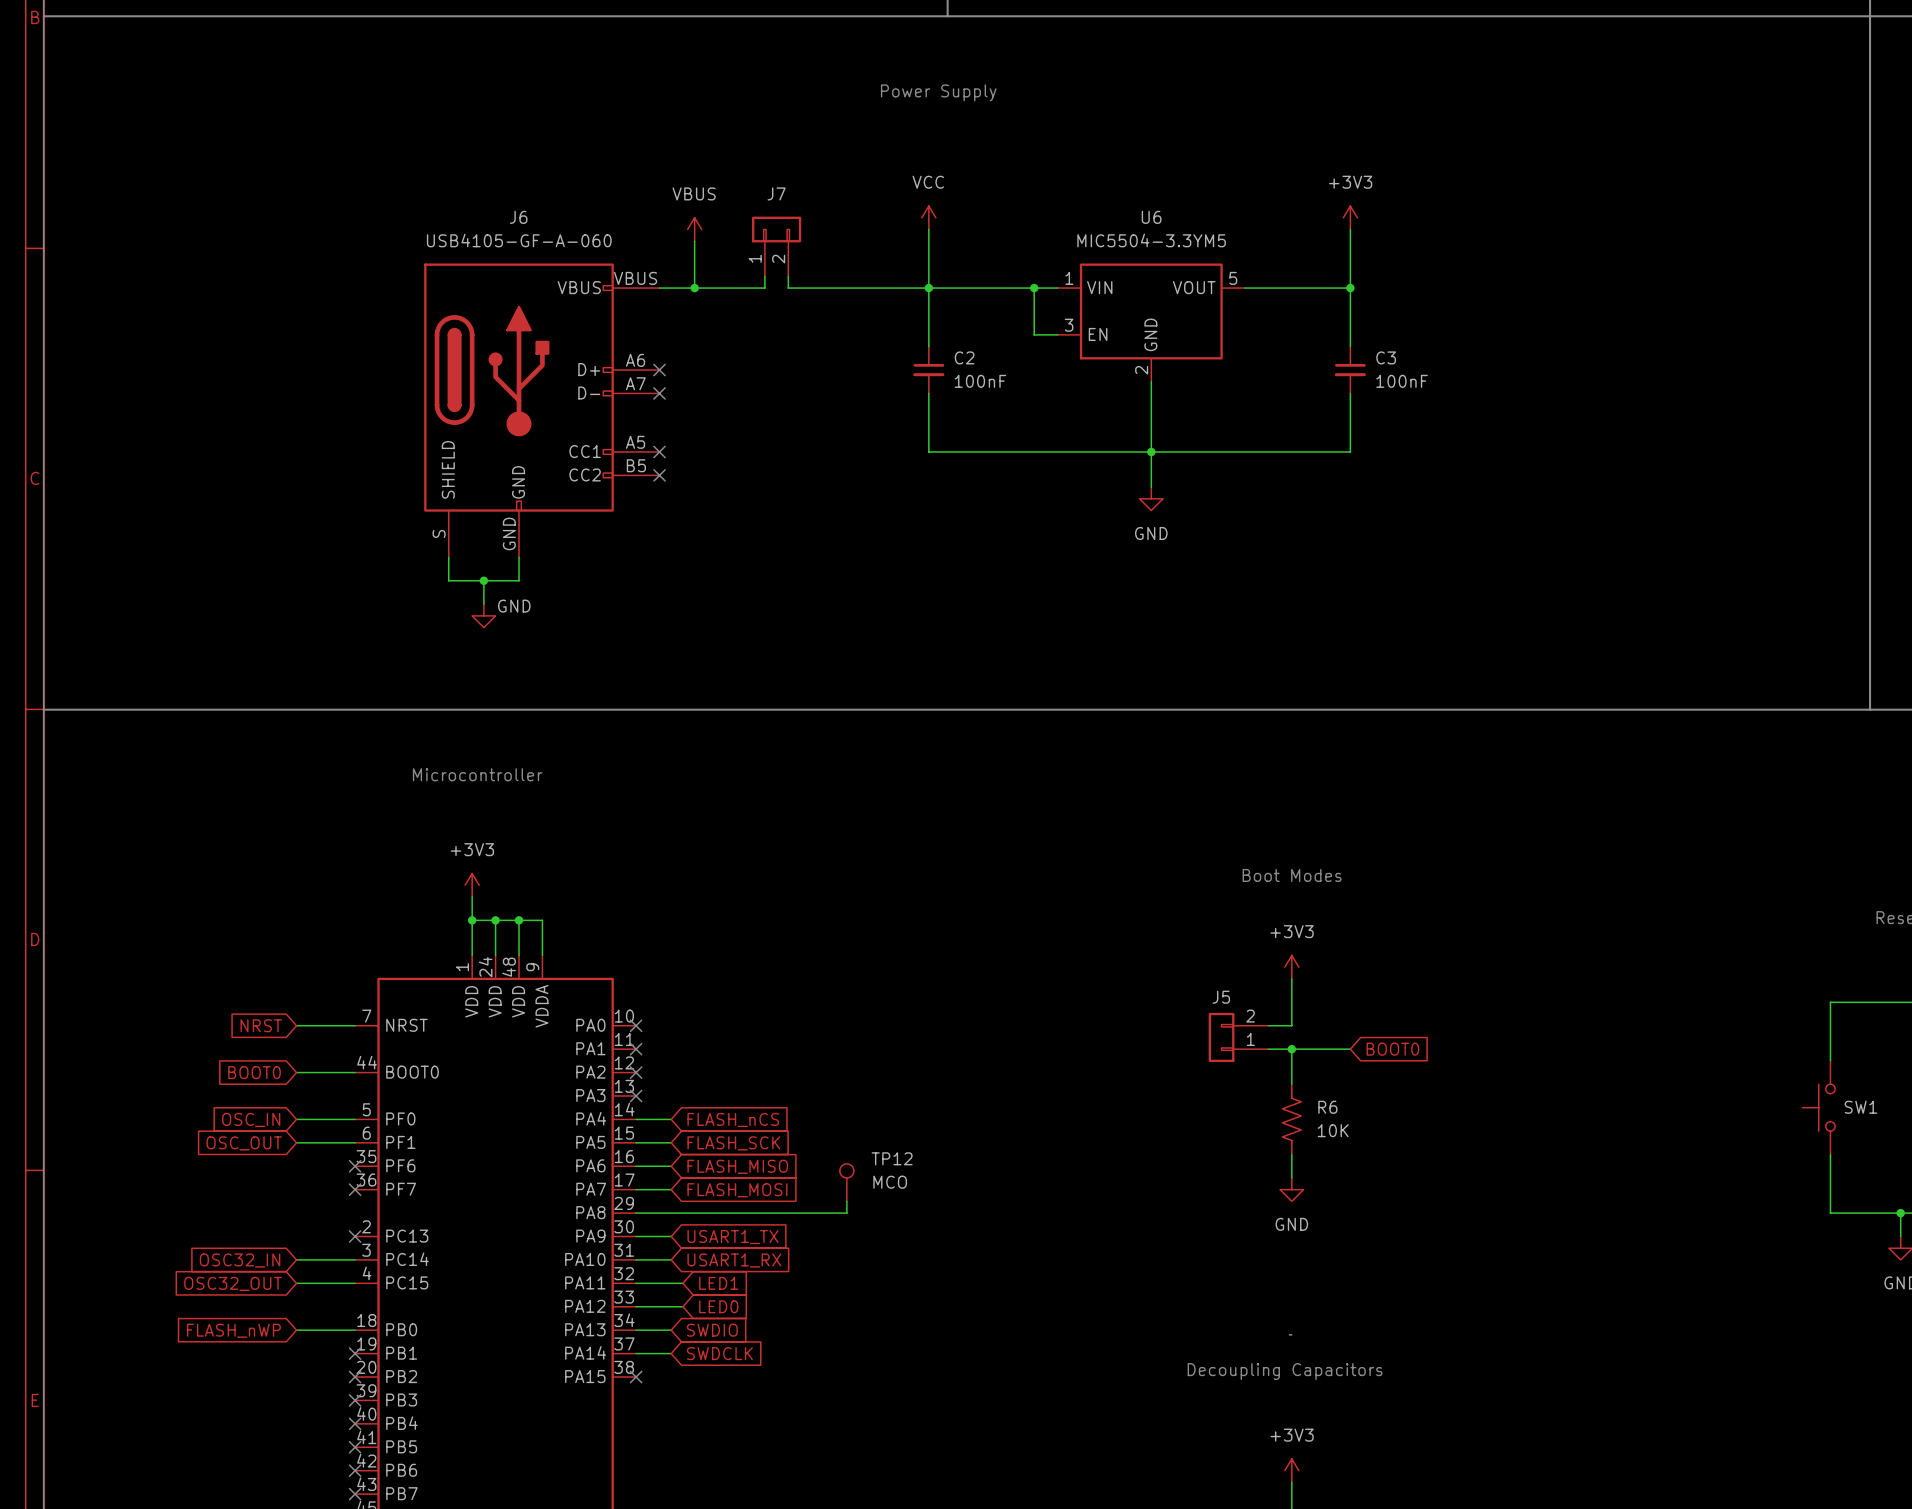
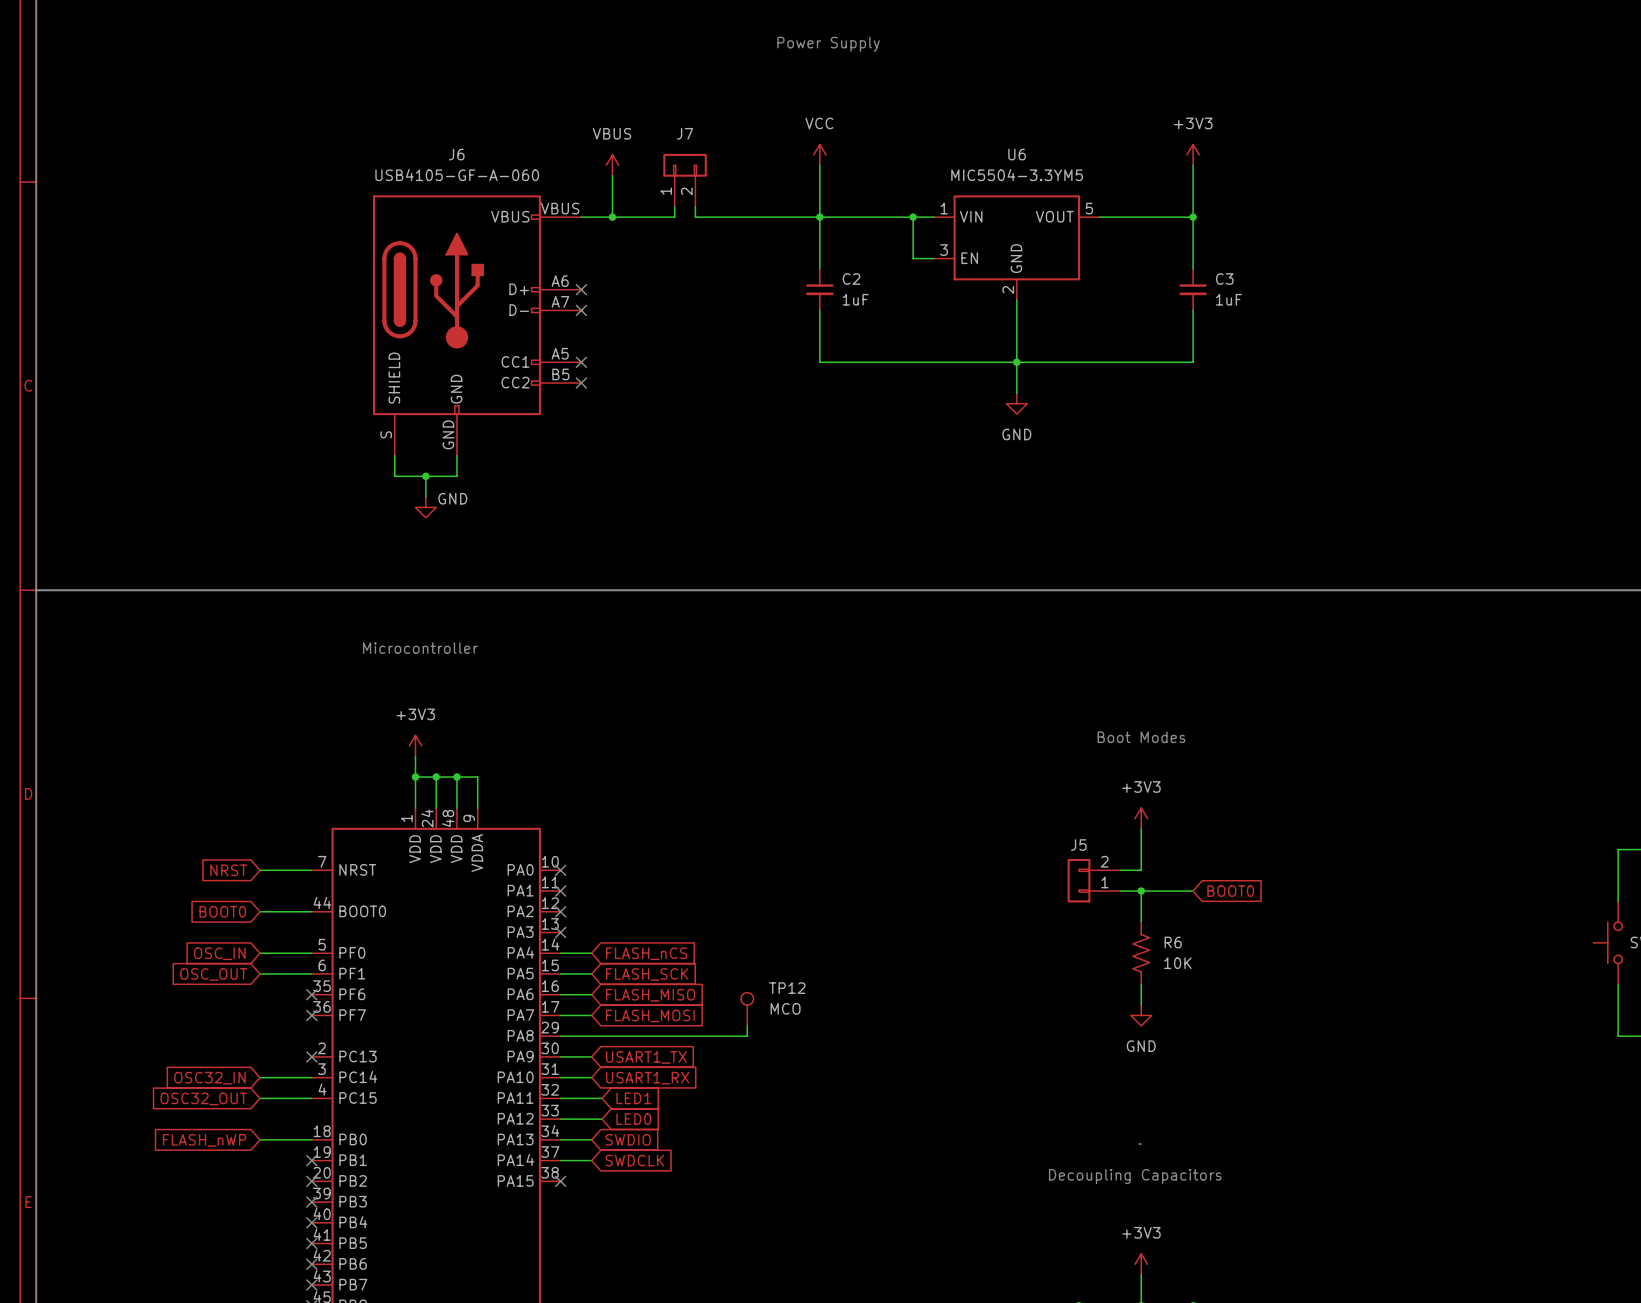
C2 value: 100nF (980, 381) -> 1uF (855, 299)
C3 value: 100nF (1402, 381) -> 1uF (1228, 299)

